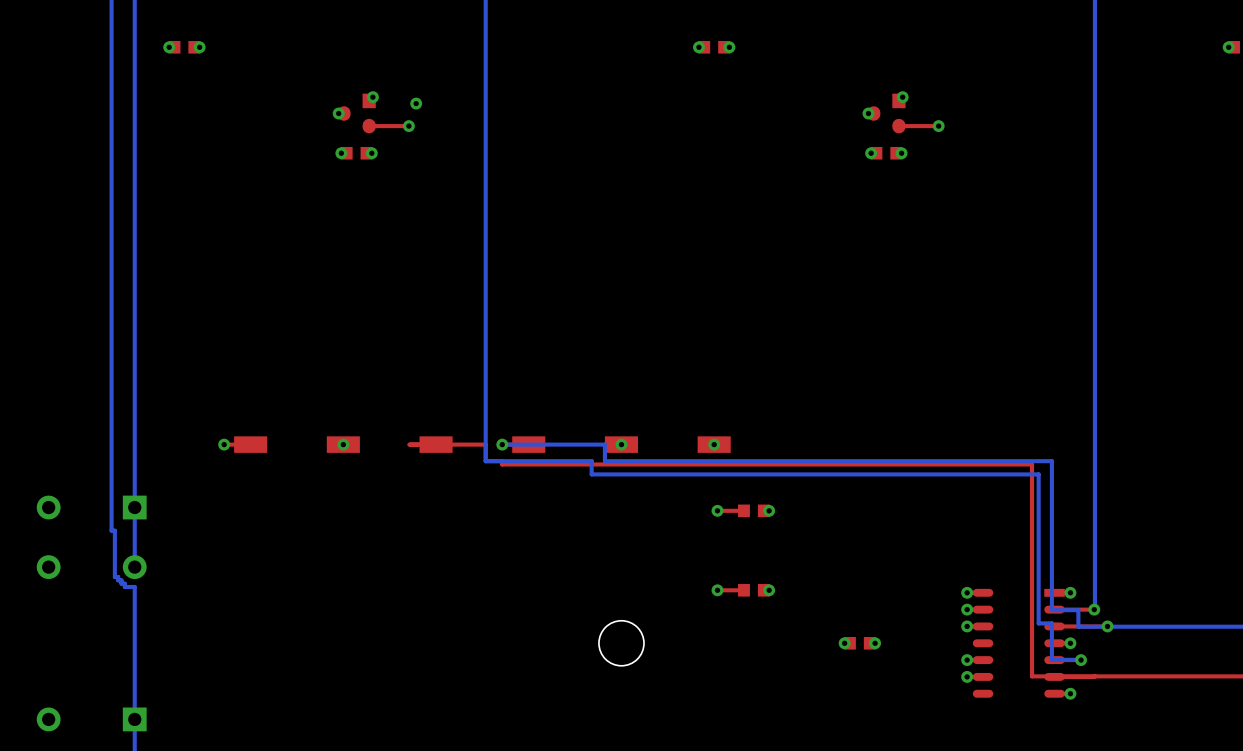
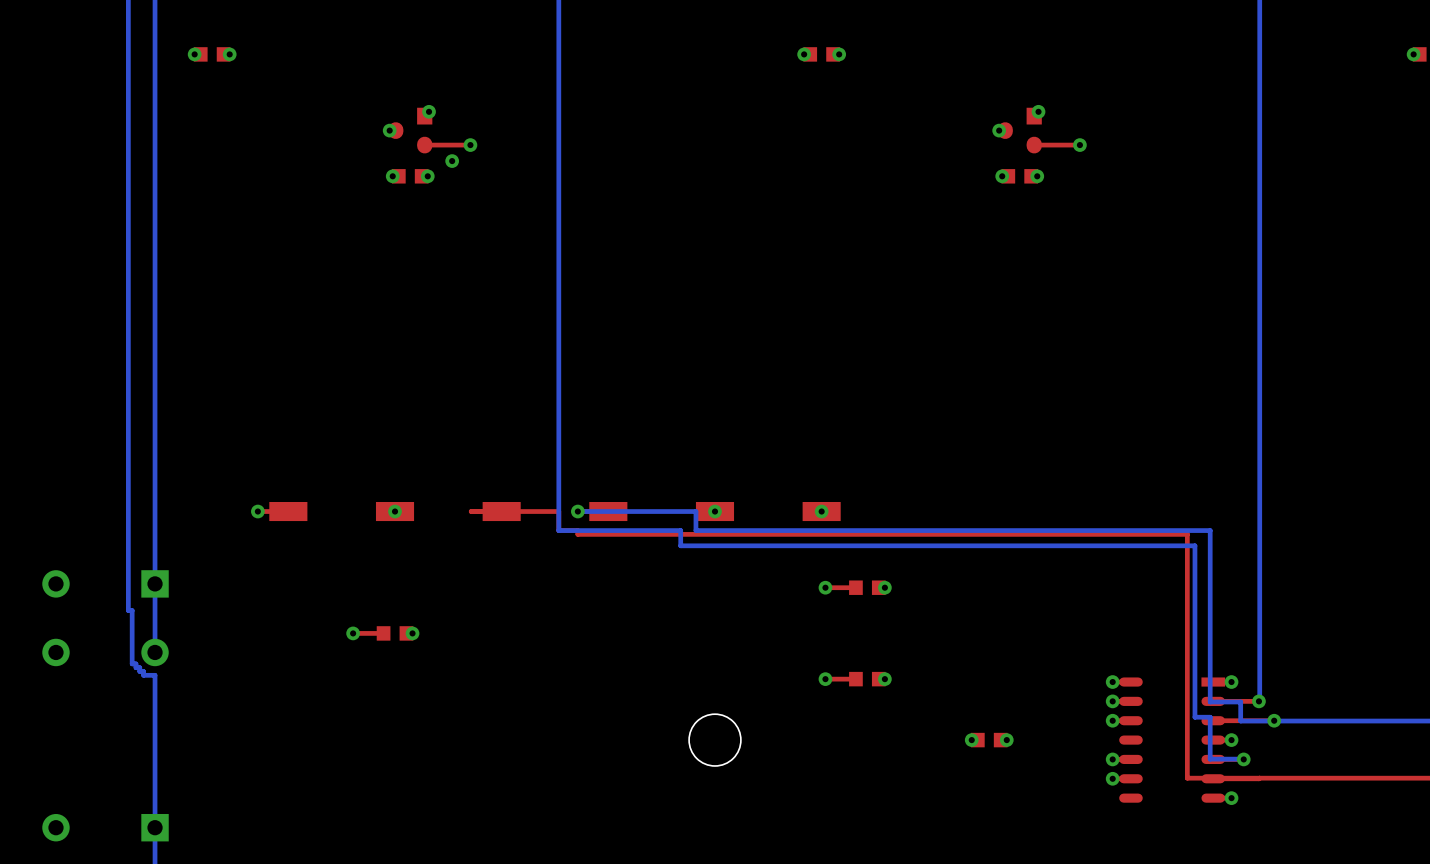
via position: (416, 103) -> (452, 161)
via: none -> (353, 633)
top track: none -> (383, 633) (353, 633)
part: none -> (395, 633)
via: none -> (412, 633)

